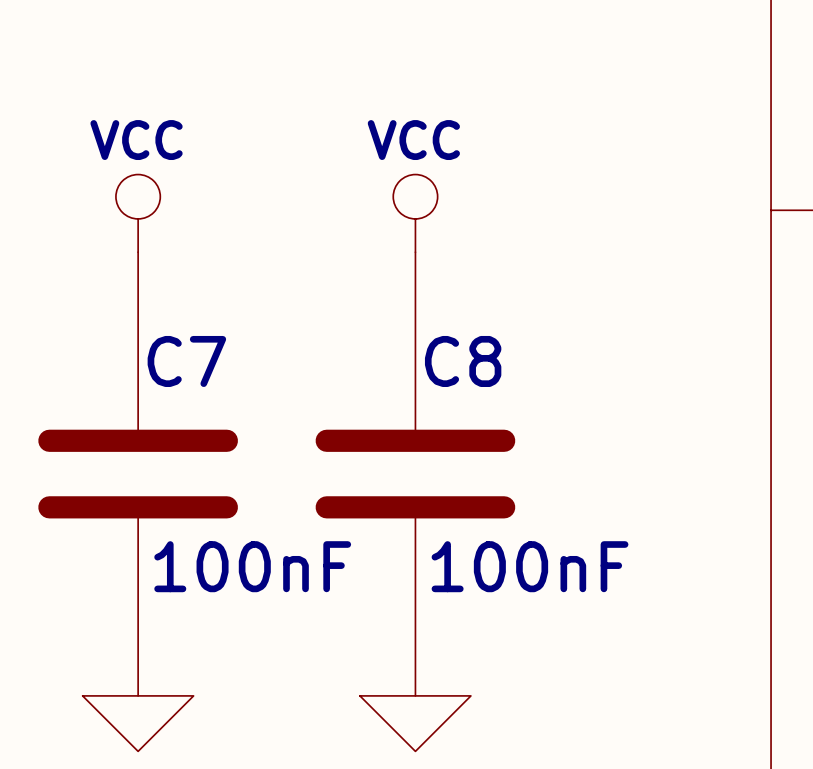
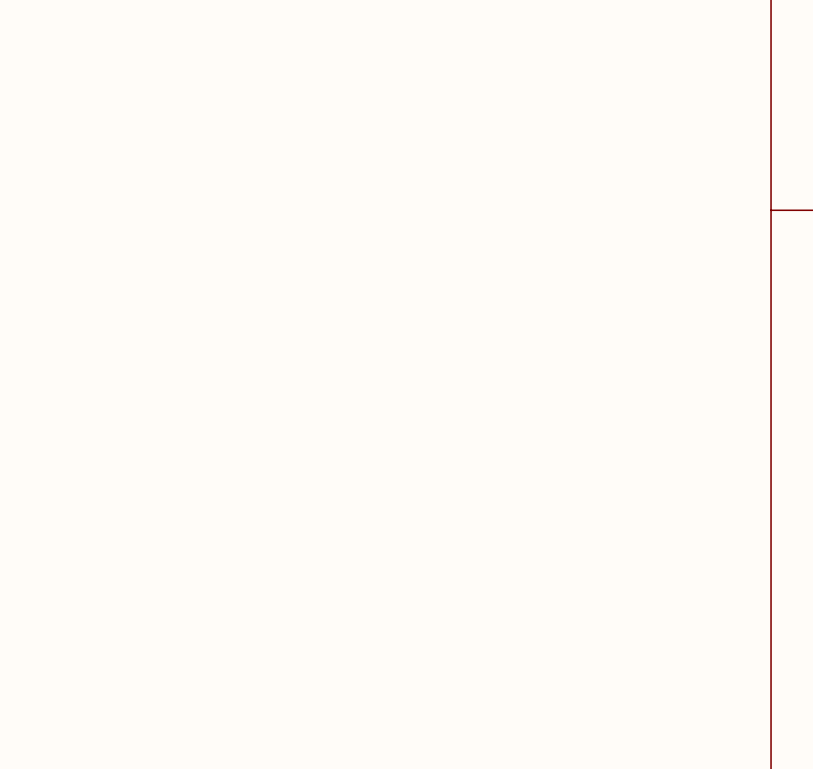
power symbol: VCC (138, 213) -> none
power symbol: VCC (415, 213) -> none
C7: 100nF (138, 474) -> none
C8: 100nF (415, 474) -> none
power symbol: (138, 723) -> none
power symbol: (415, 723) -> none

